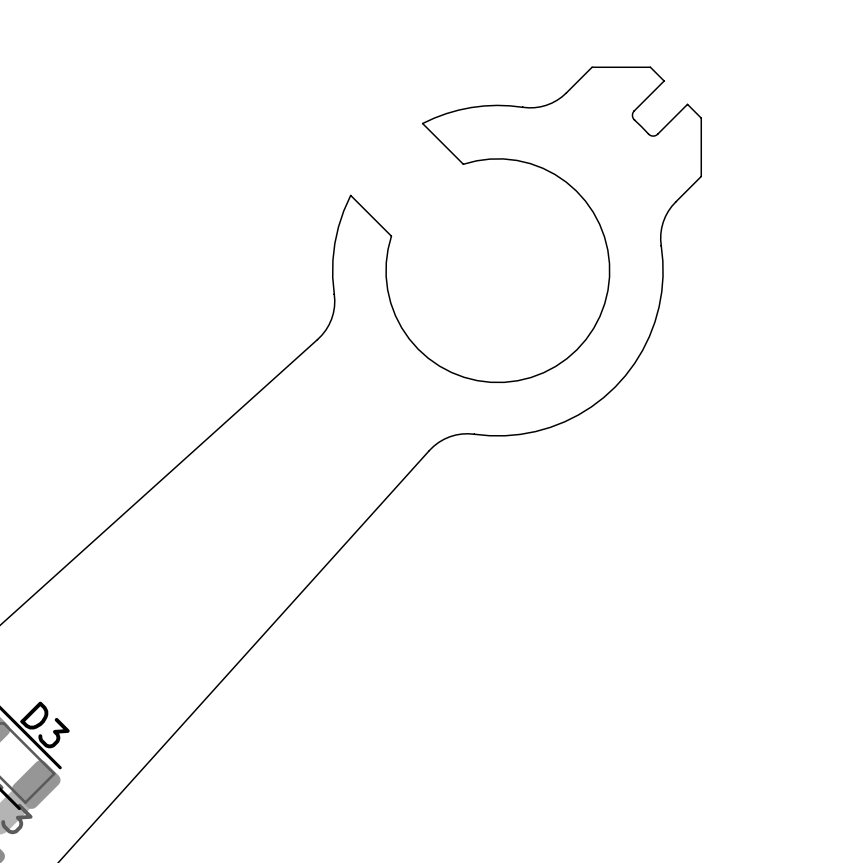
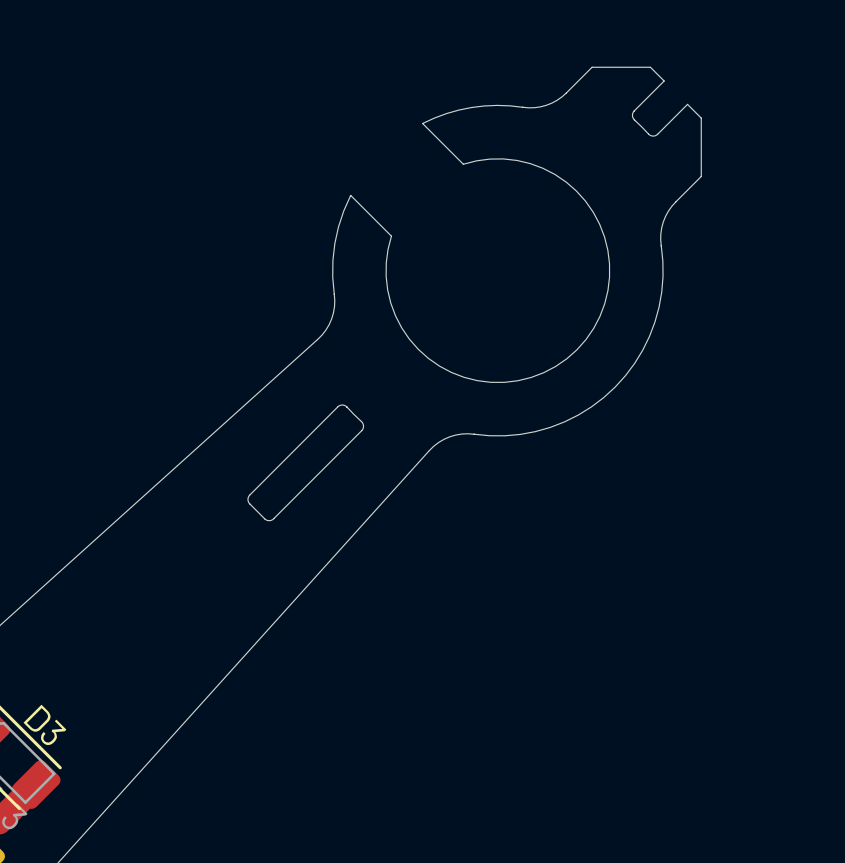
board edge: none -> (337, 407) (249, 495) (248, 502) (265, 519) (273, 519) (362, 429) (362, 422) (346, 406) (342, 405) (337, 407)

